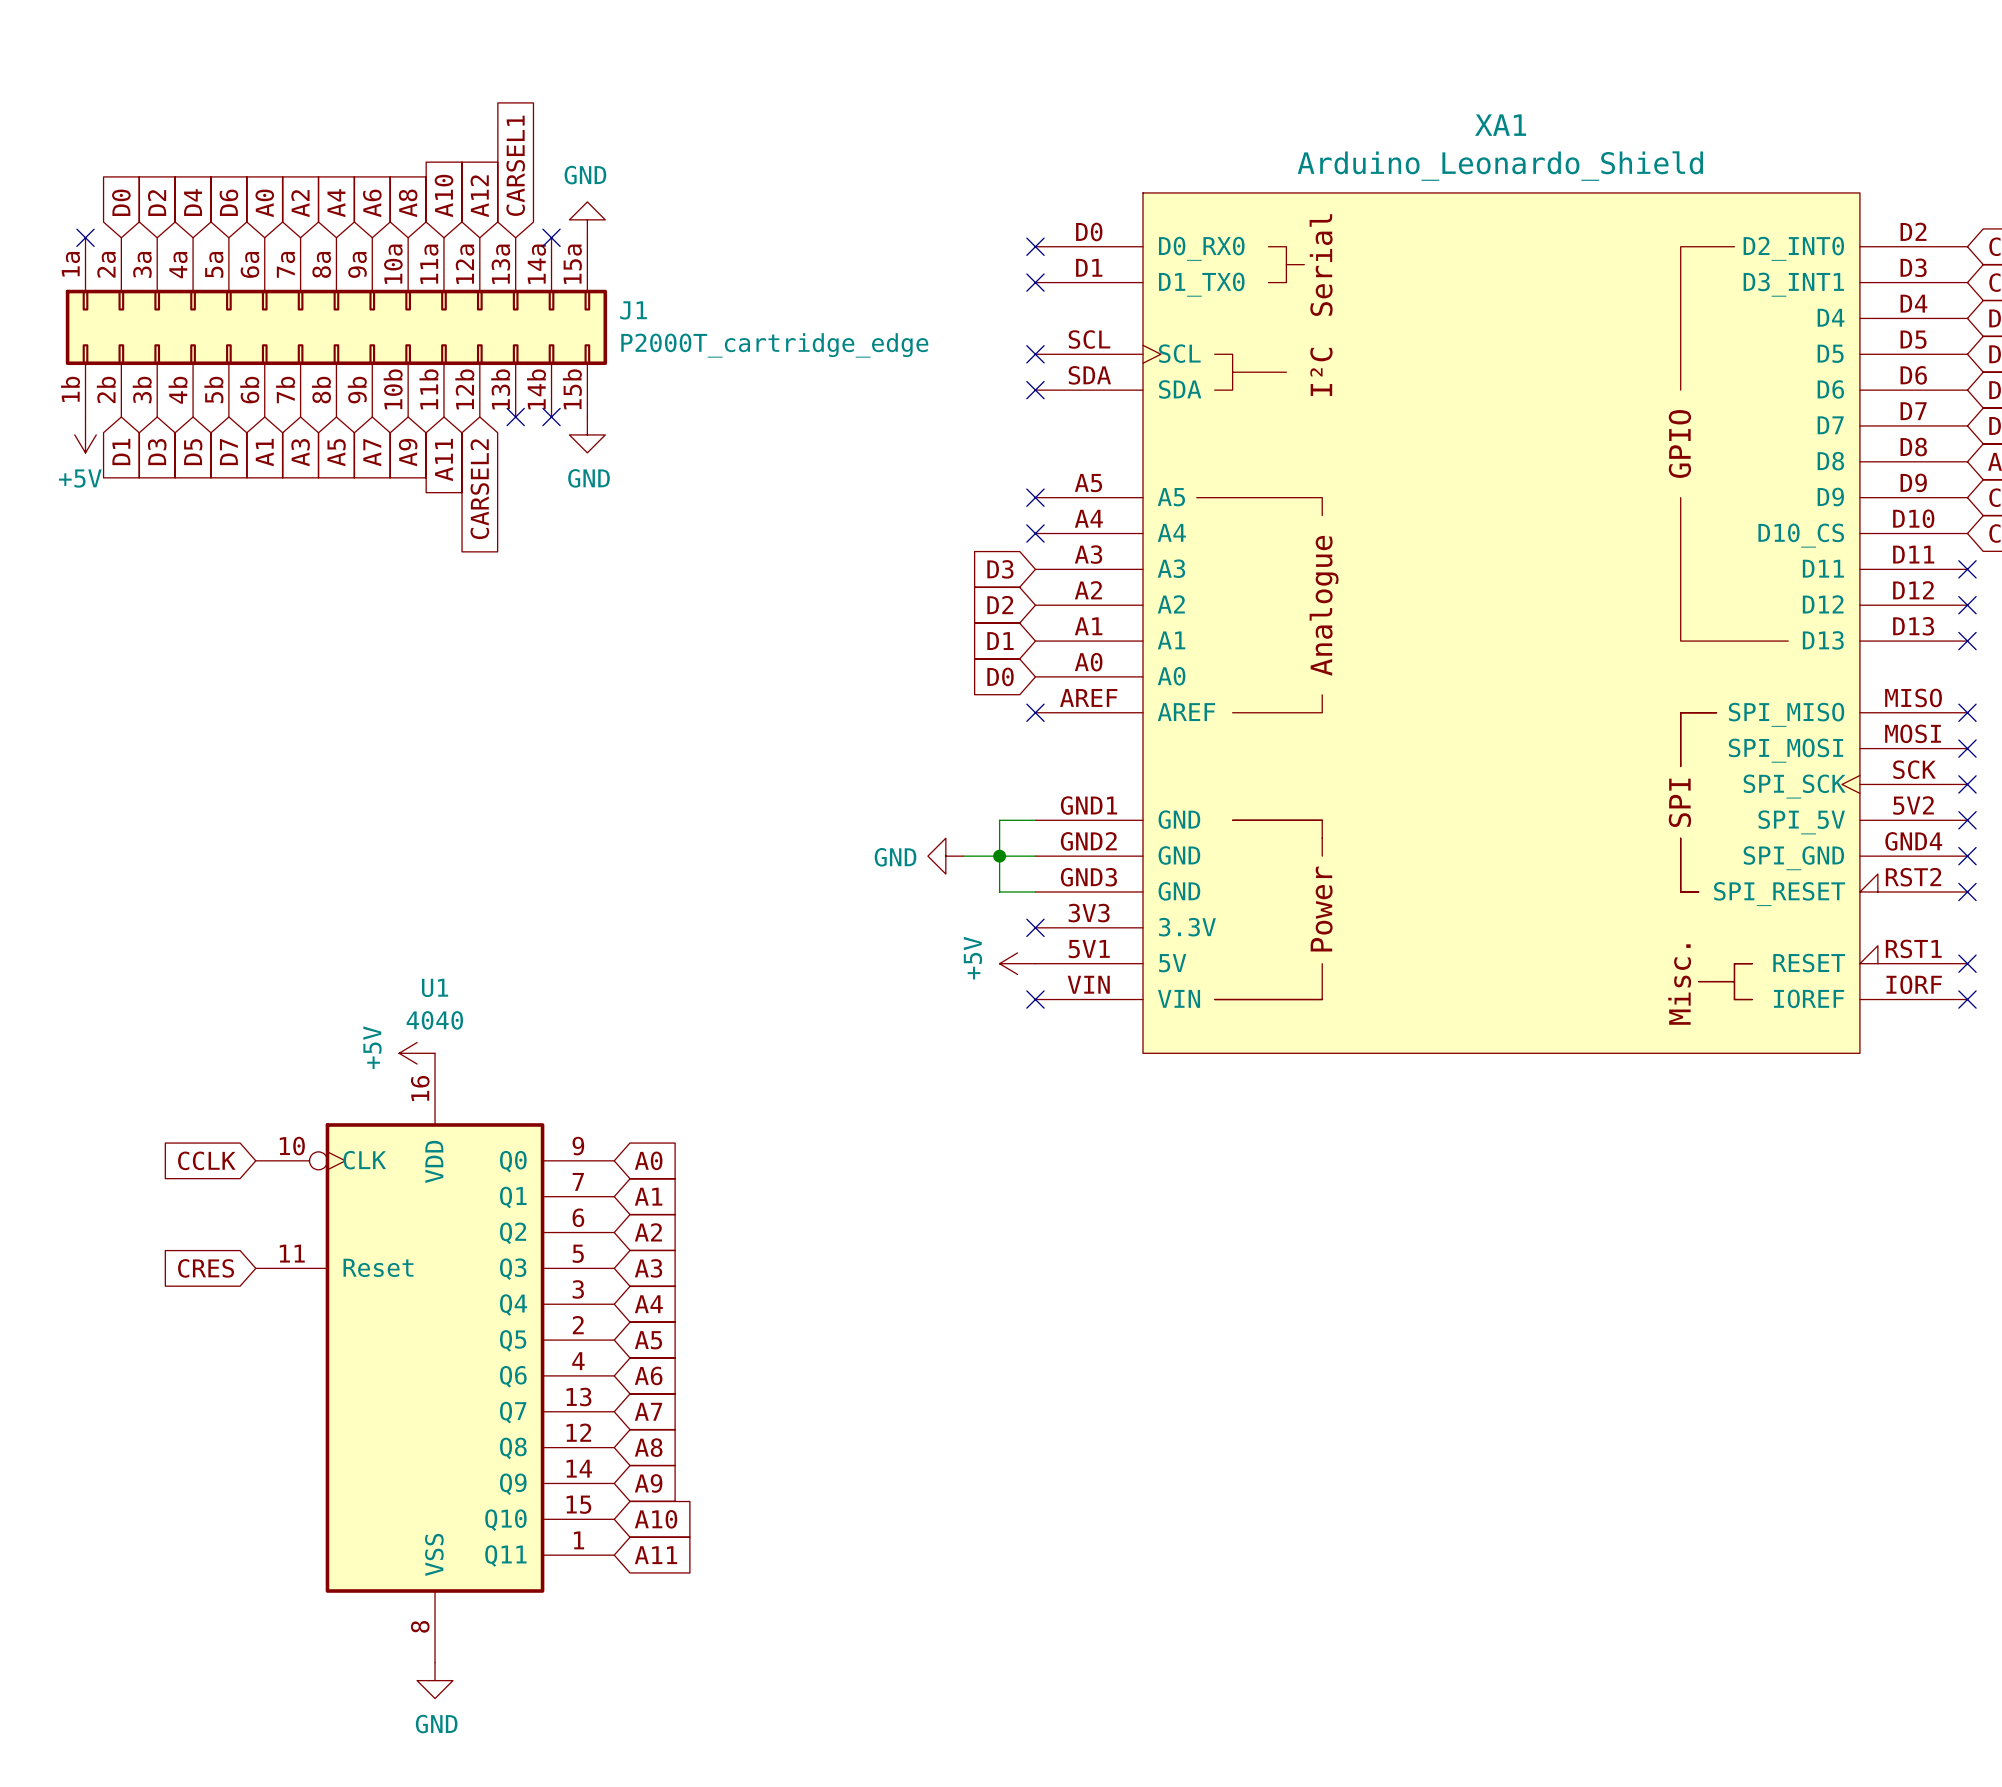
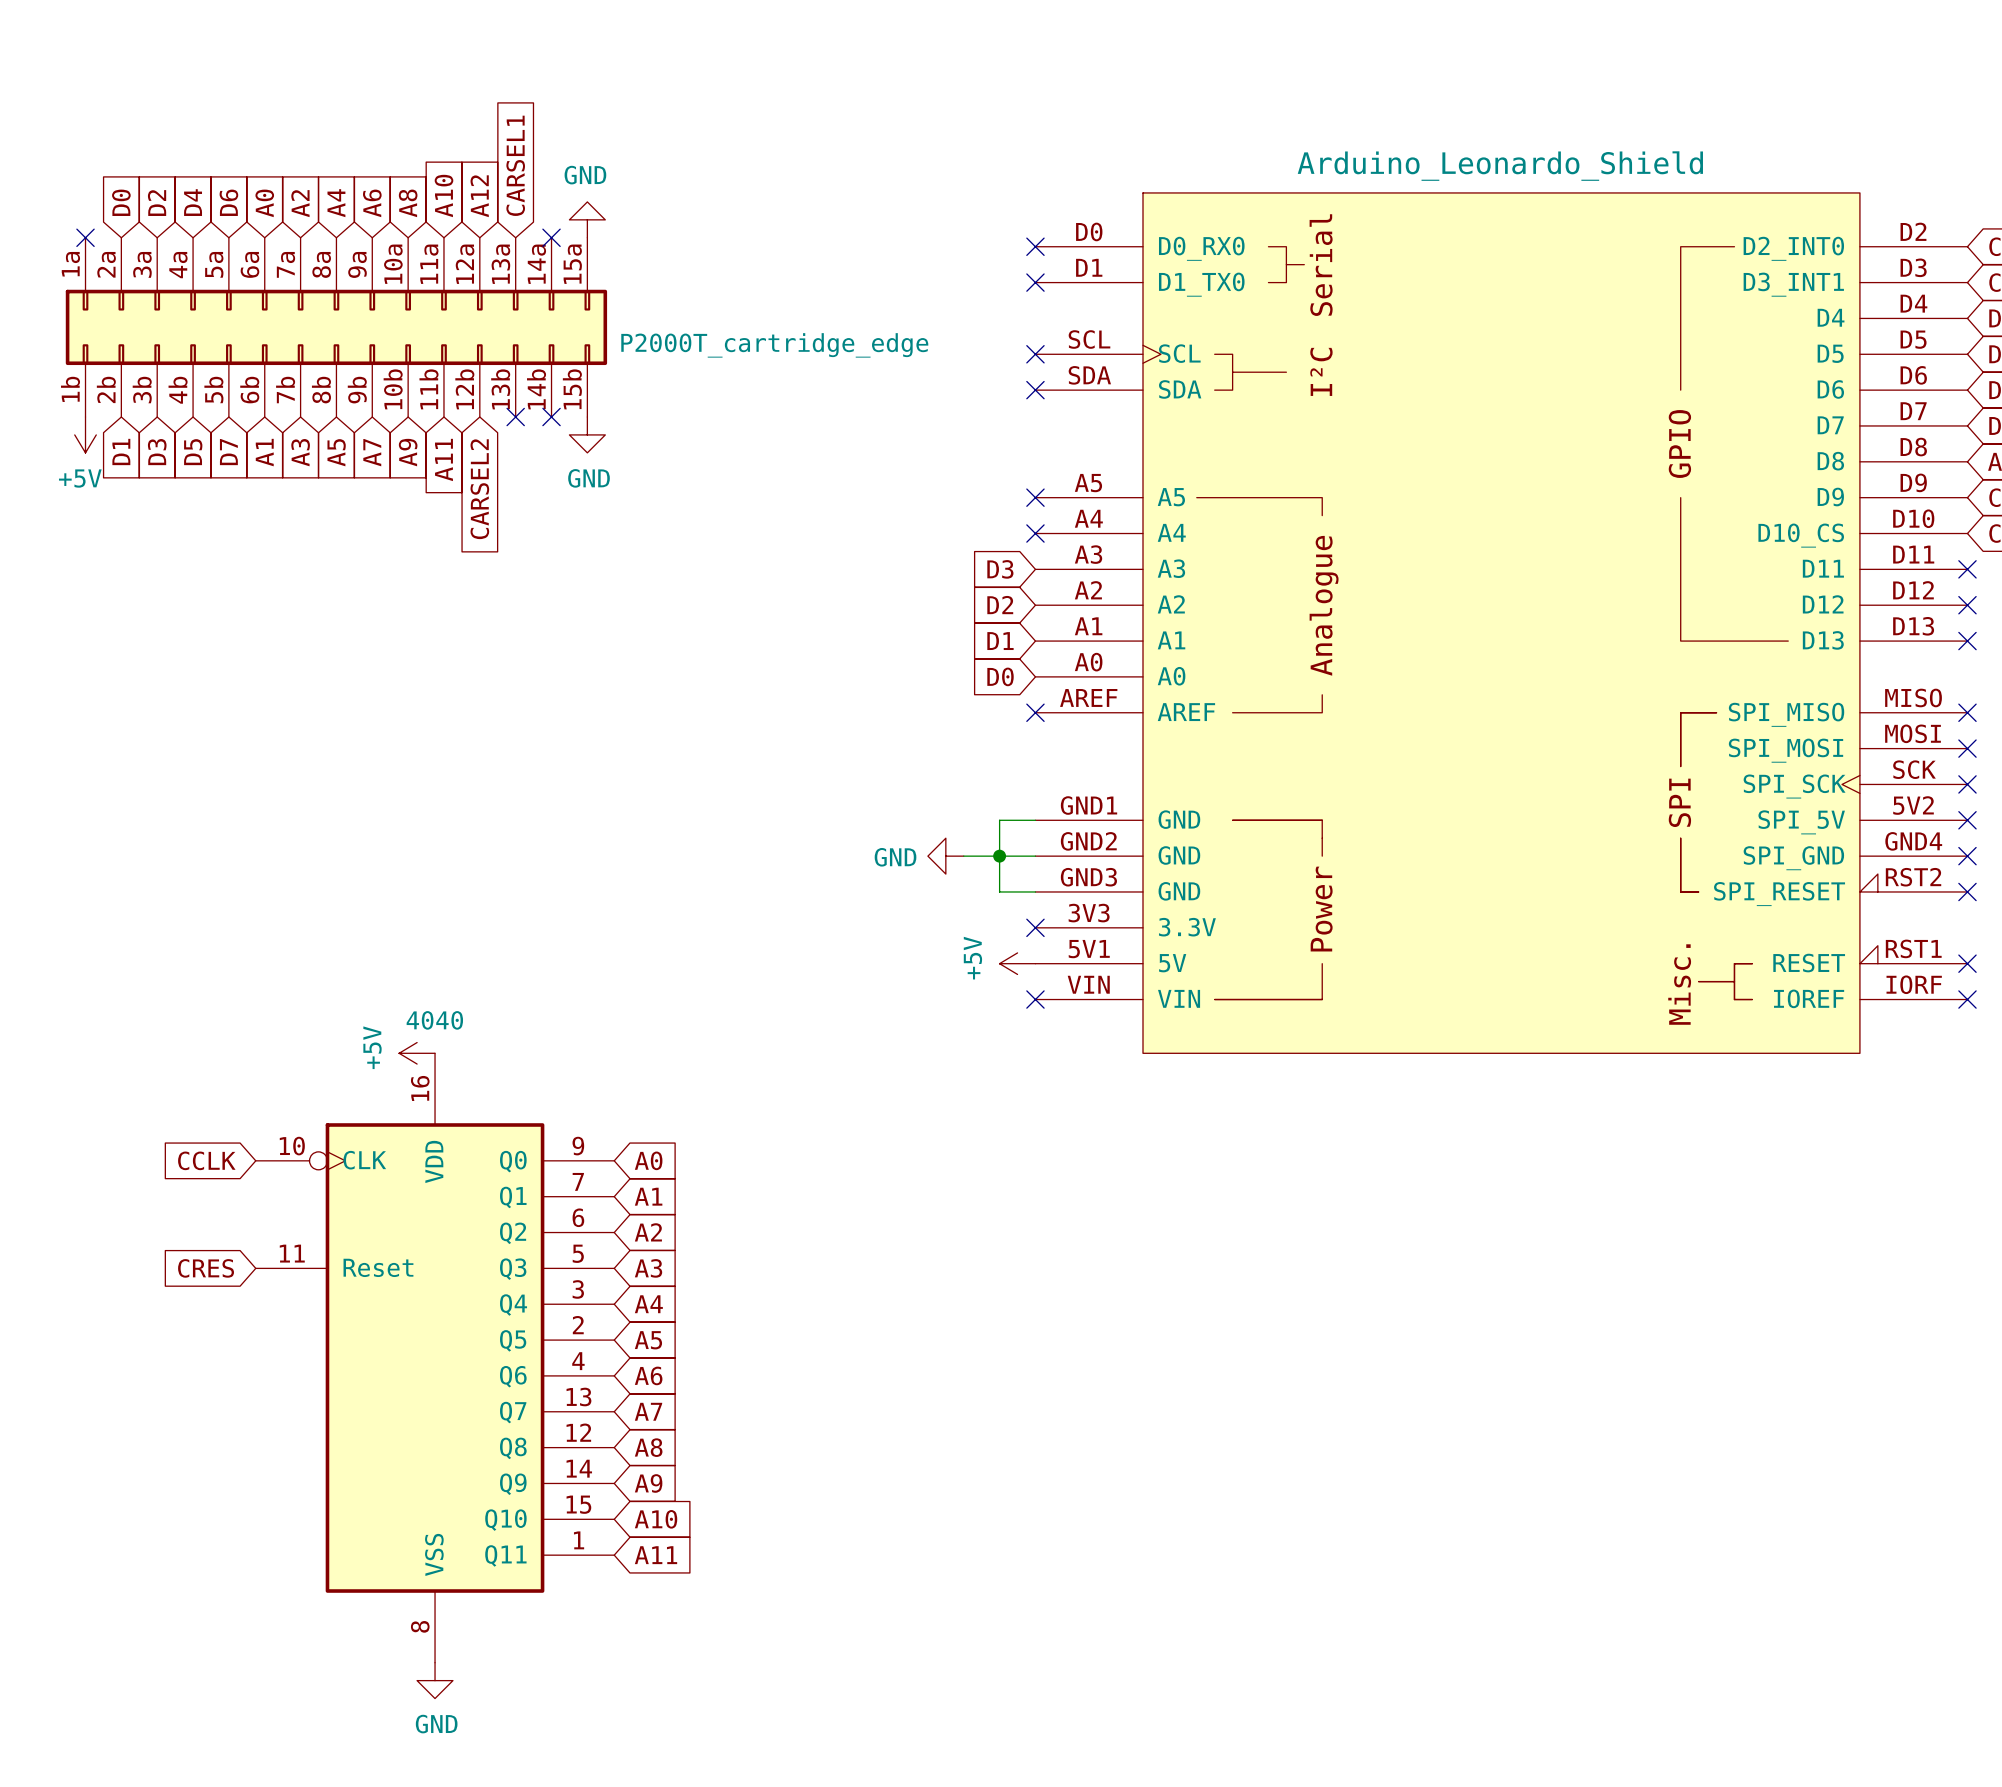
XA1 name: XA1 (1500, 125) -> none
J1 name: J1 (633, 310) -> none
U1 name: U1 (435, 987) -> none

